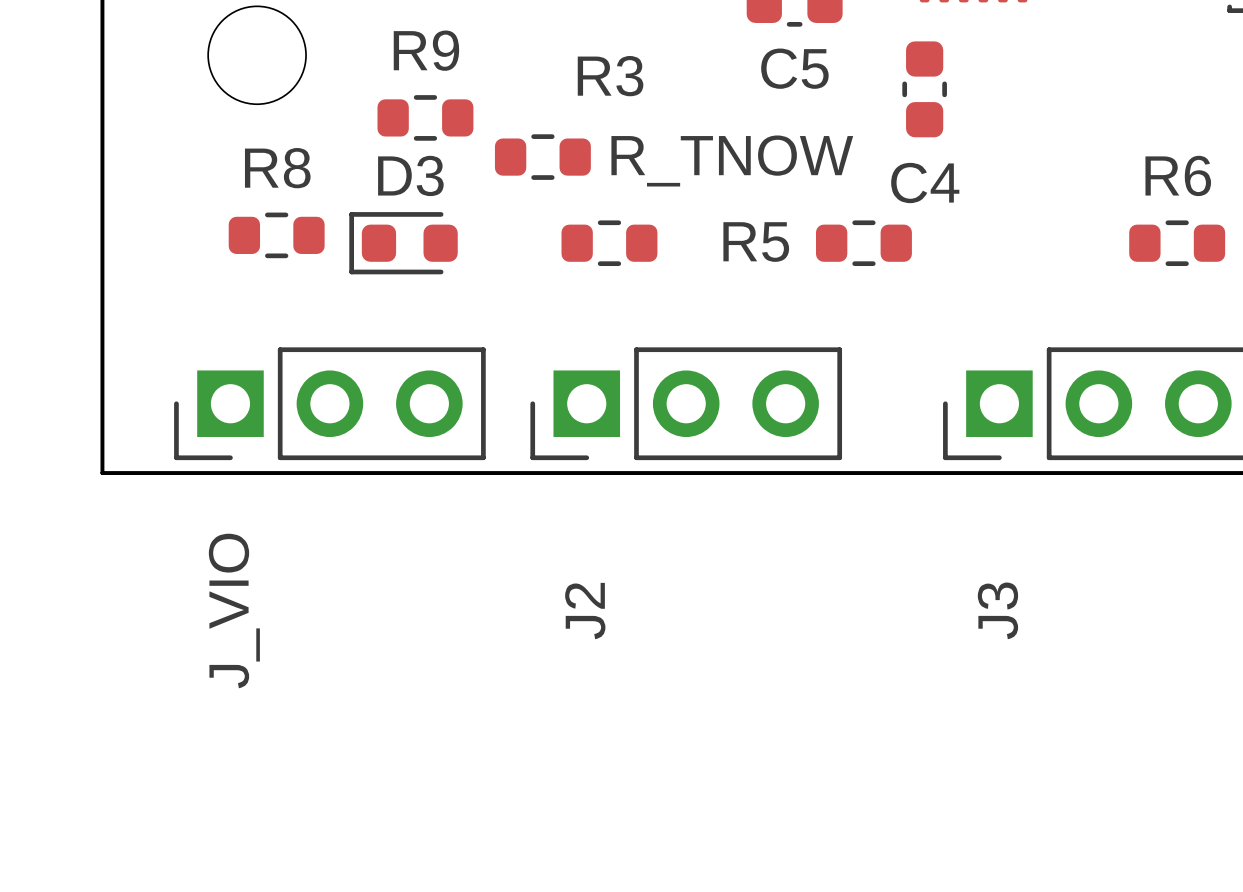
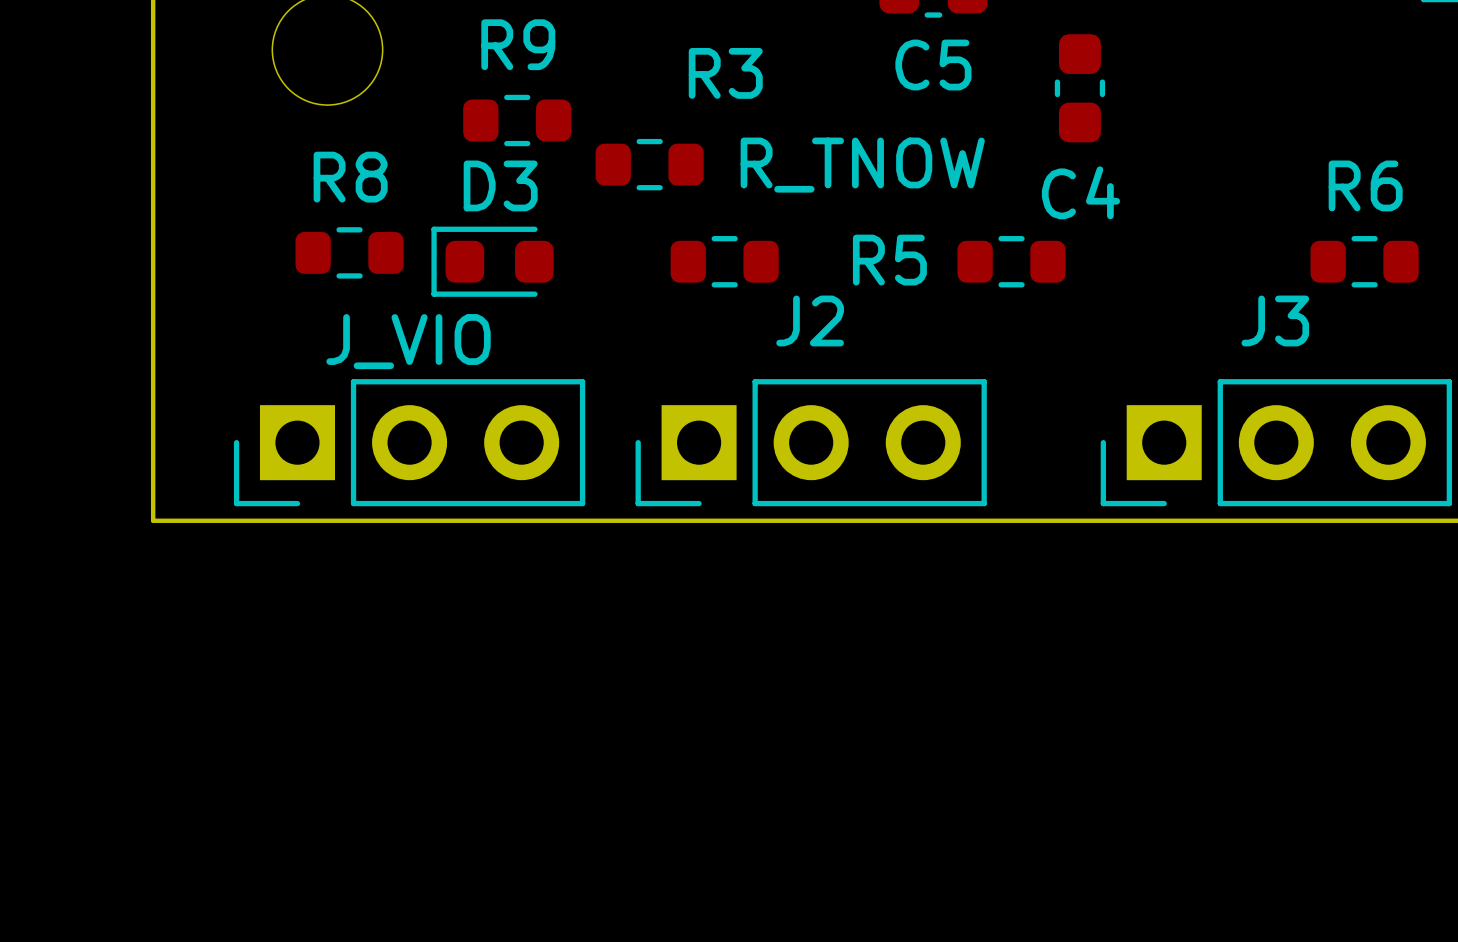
J_VIO name rotation: 0° (234, 610) -> 90° clockwise (408, 341)
J_VIO name position: J_VIO (234, 610) -> J_VIO (408, 341)
J3 name rotation: 0° (997, 610) -> 90° clockwise (1275, 320)
J3 name position: J3 (997, 610) -> J3 (1275, 320)
J2 name rotation: 0° (585, 611) -> 90° clockwise (810, 320)
J2 name position: J2 (585, 611) -> J2 (810, 320)

